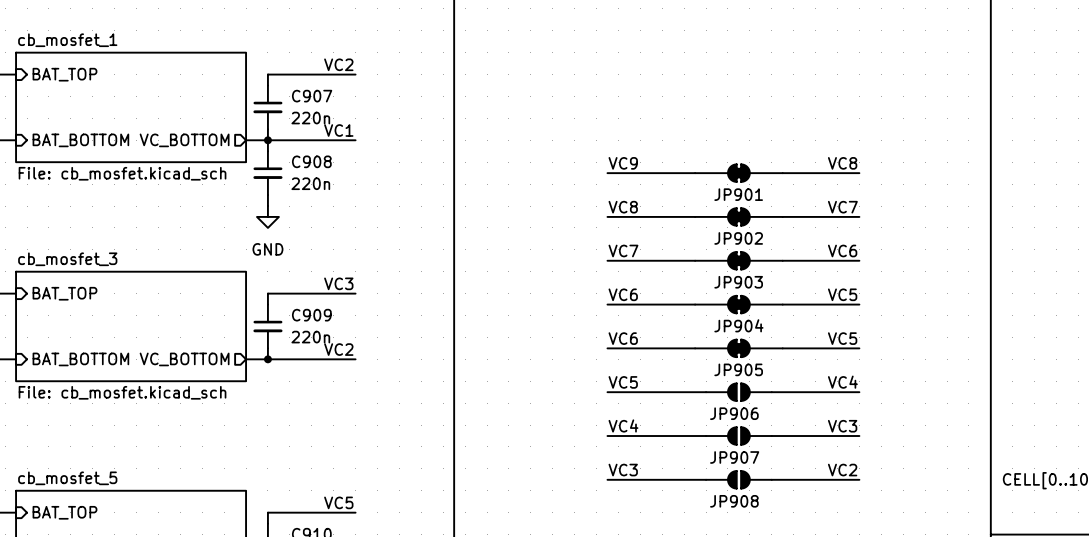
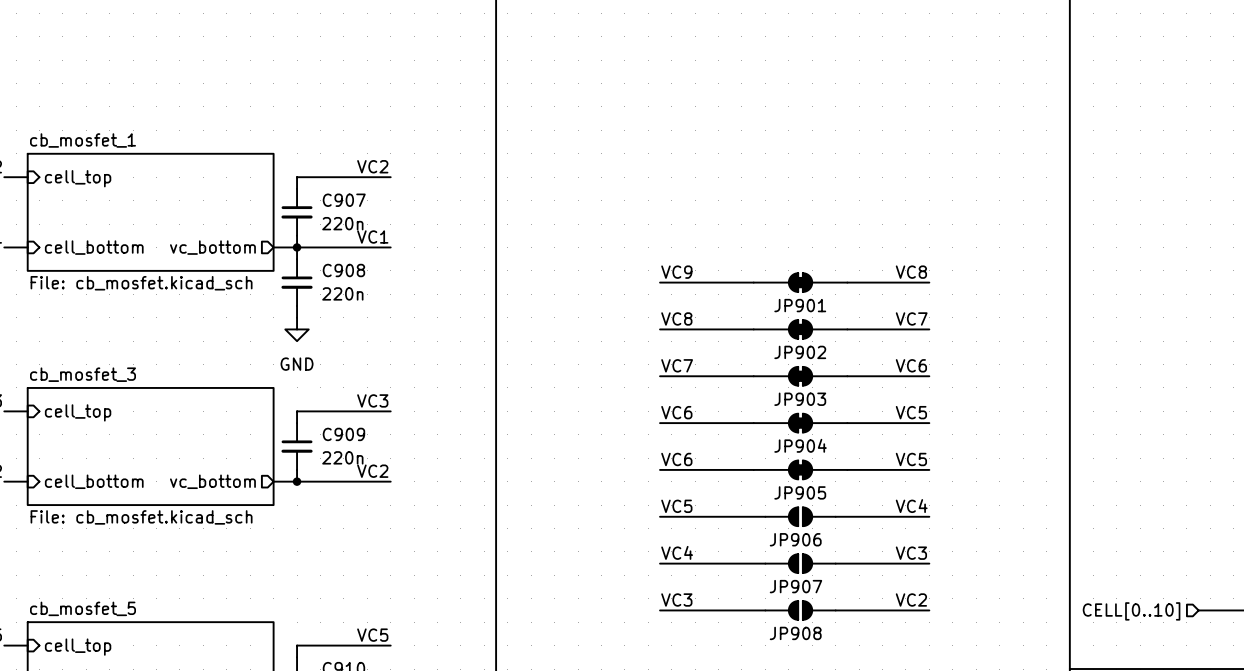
sheet pin: BAT_TOP (64, 74) -> cell_top (78, 178)
sheet pin: BAT_BOTTOM (80, 140) -> cell_bottom (94, 247)
sheet pin: VC_BOTTOM (184, 140) -> vc_bottom (212, 247)
sheet pin: BAT_TOP (64, 293) -> cell_top (78, 412)
sheet pin: BAT_BOTTOM (80, 359) -> cell_bottom (94, 481)
sheet pin: VC_BOTTOM (184, 359) -> vc_bottom (212, 481)
sheet pin: BAT_TOP (64, 512) -> cell_top (78, 647)

